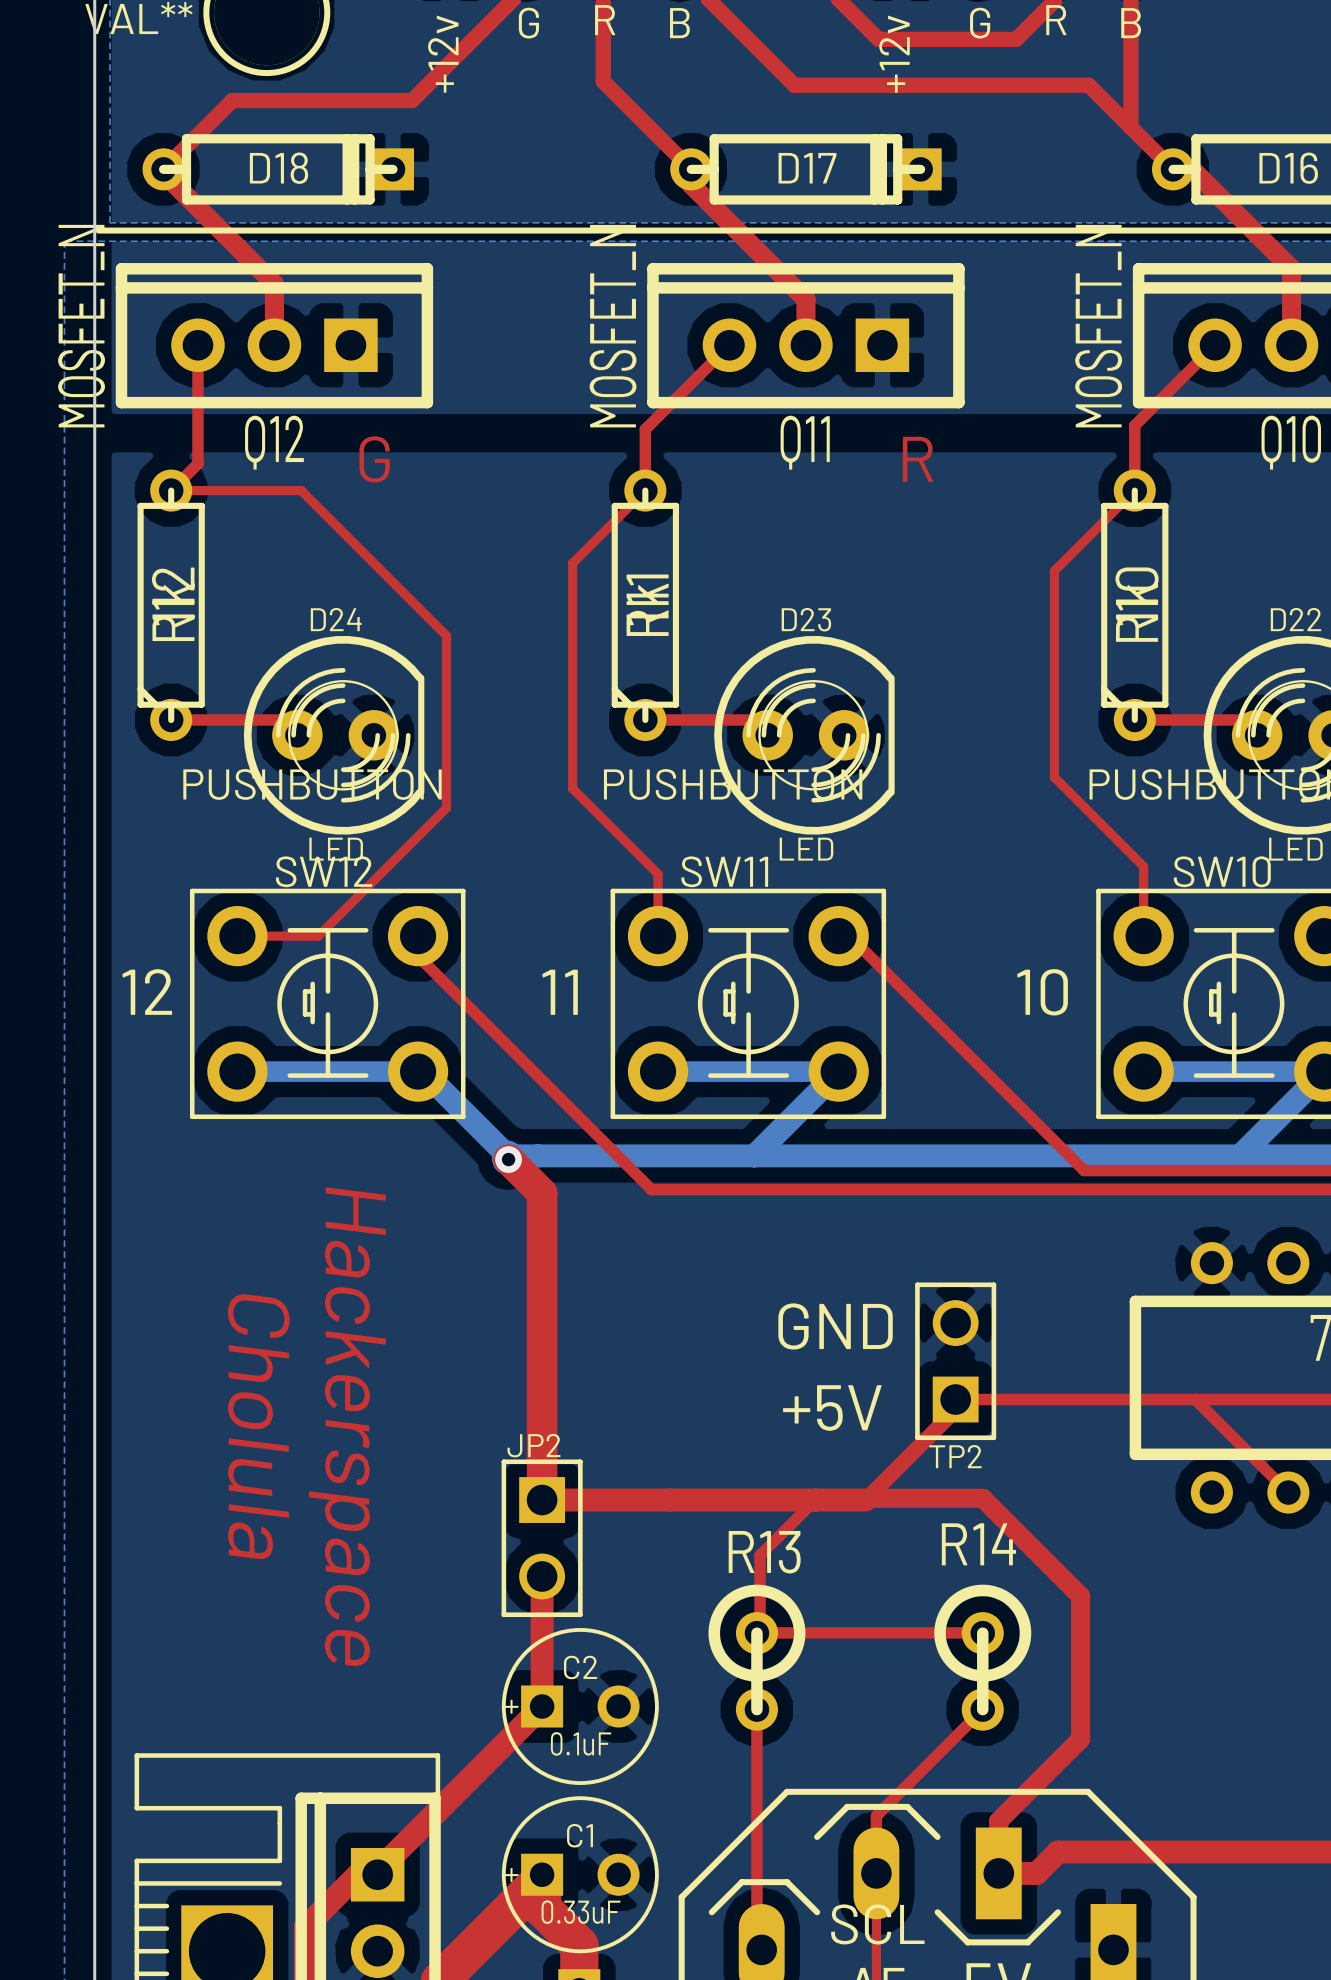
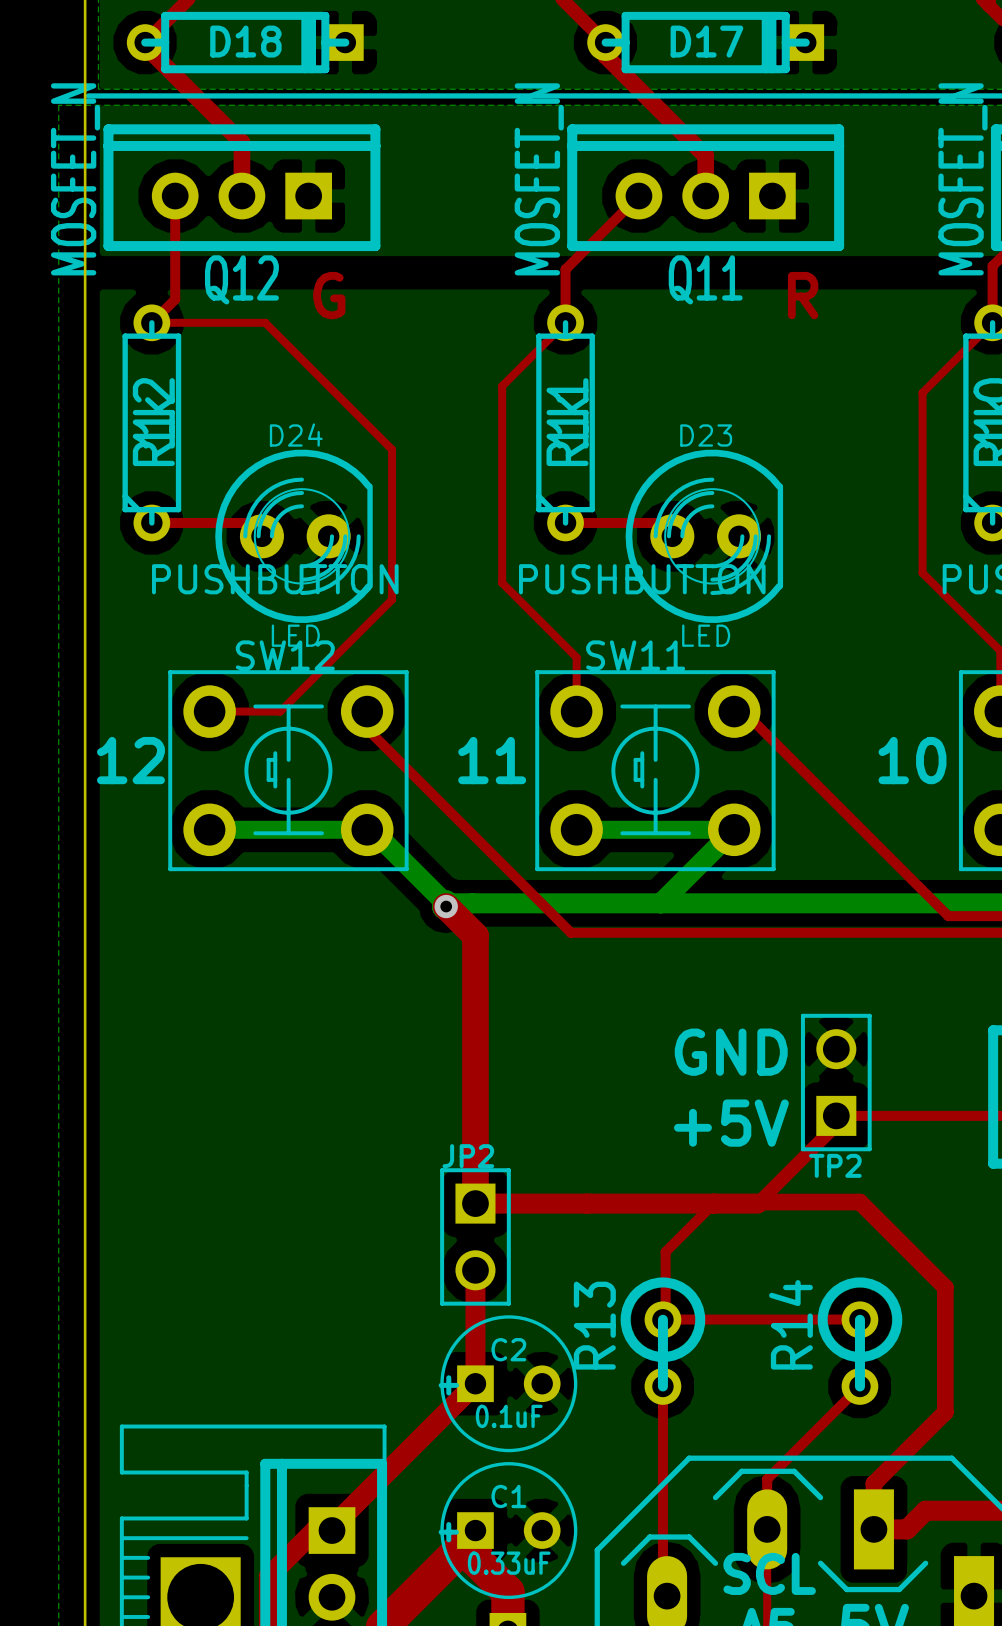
text: Cholula (258, 1426) -> none
text: Hackerspace (347, 1426) -> none
R14 name rotation: 0° (978, 1544) -> 90° counterclockwise (790, 1324)
R13 name rotation: 0° (764, 1552) -> 90° counterclockwise (594, 1325)

